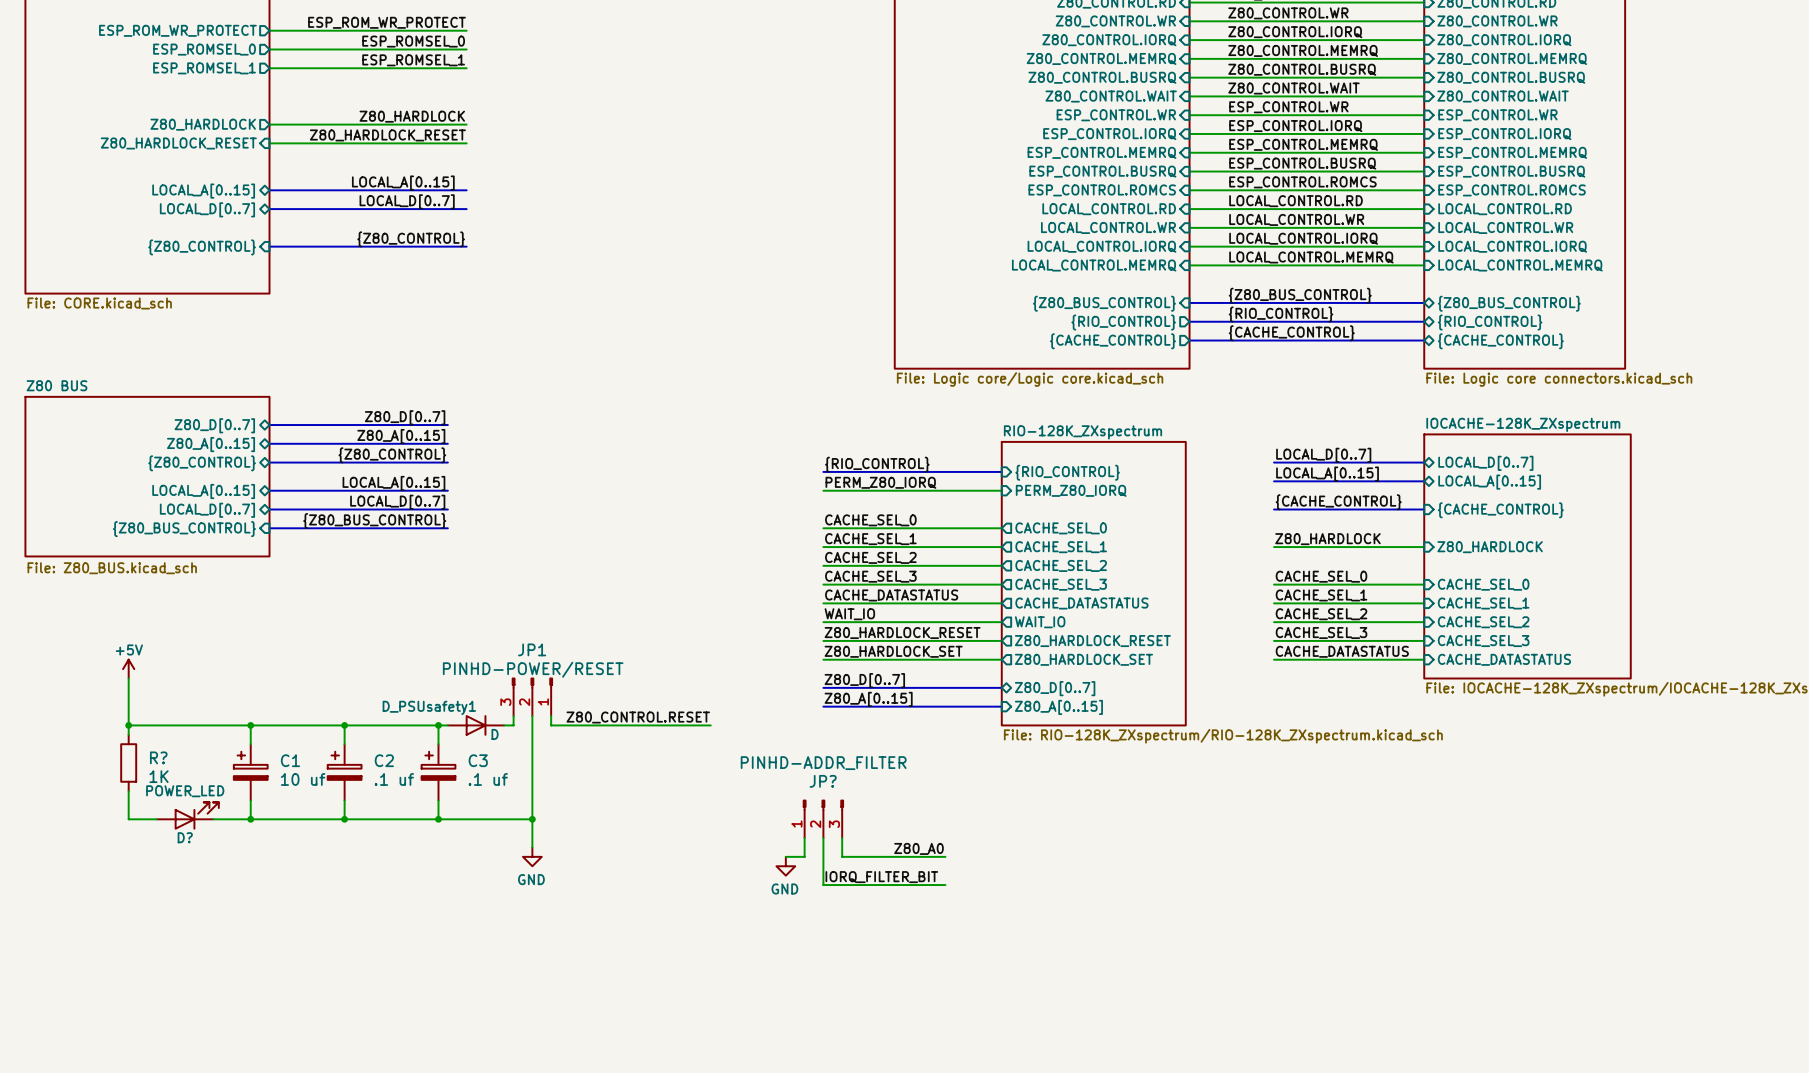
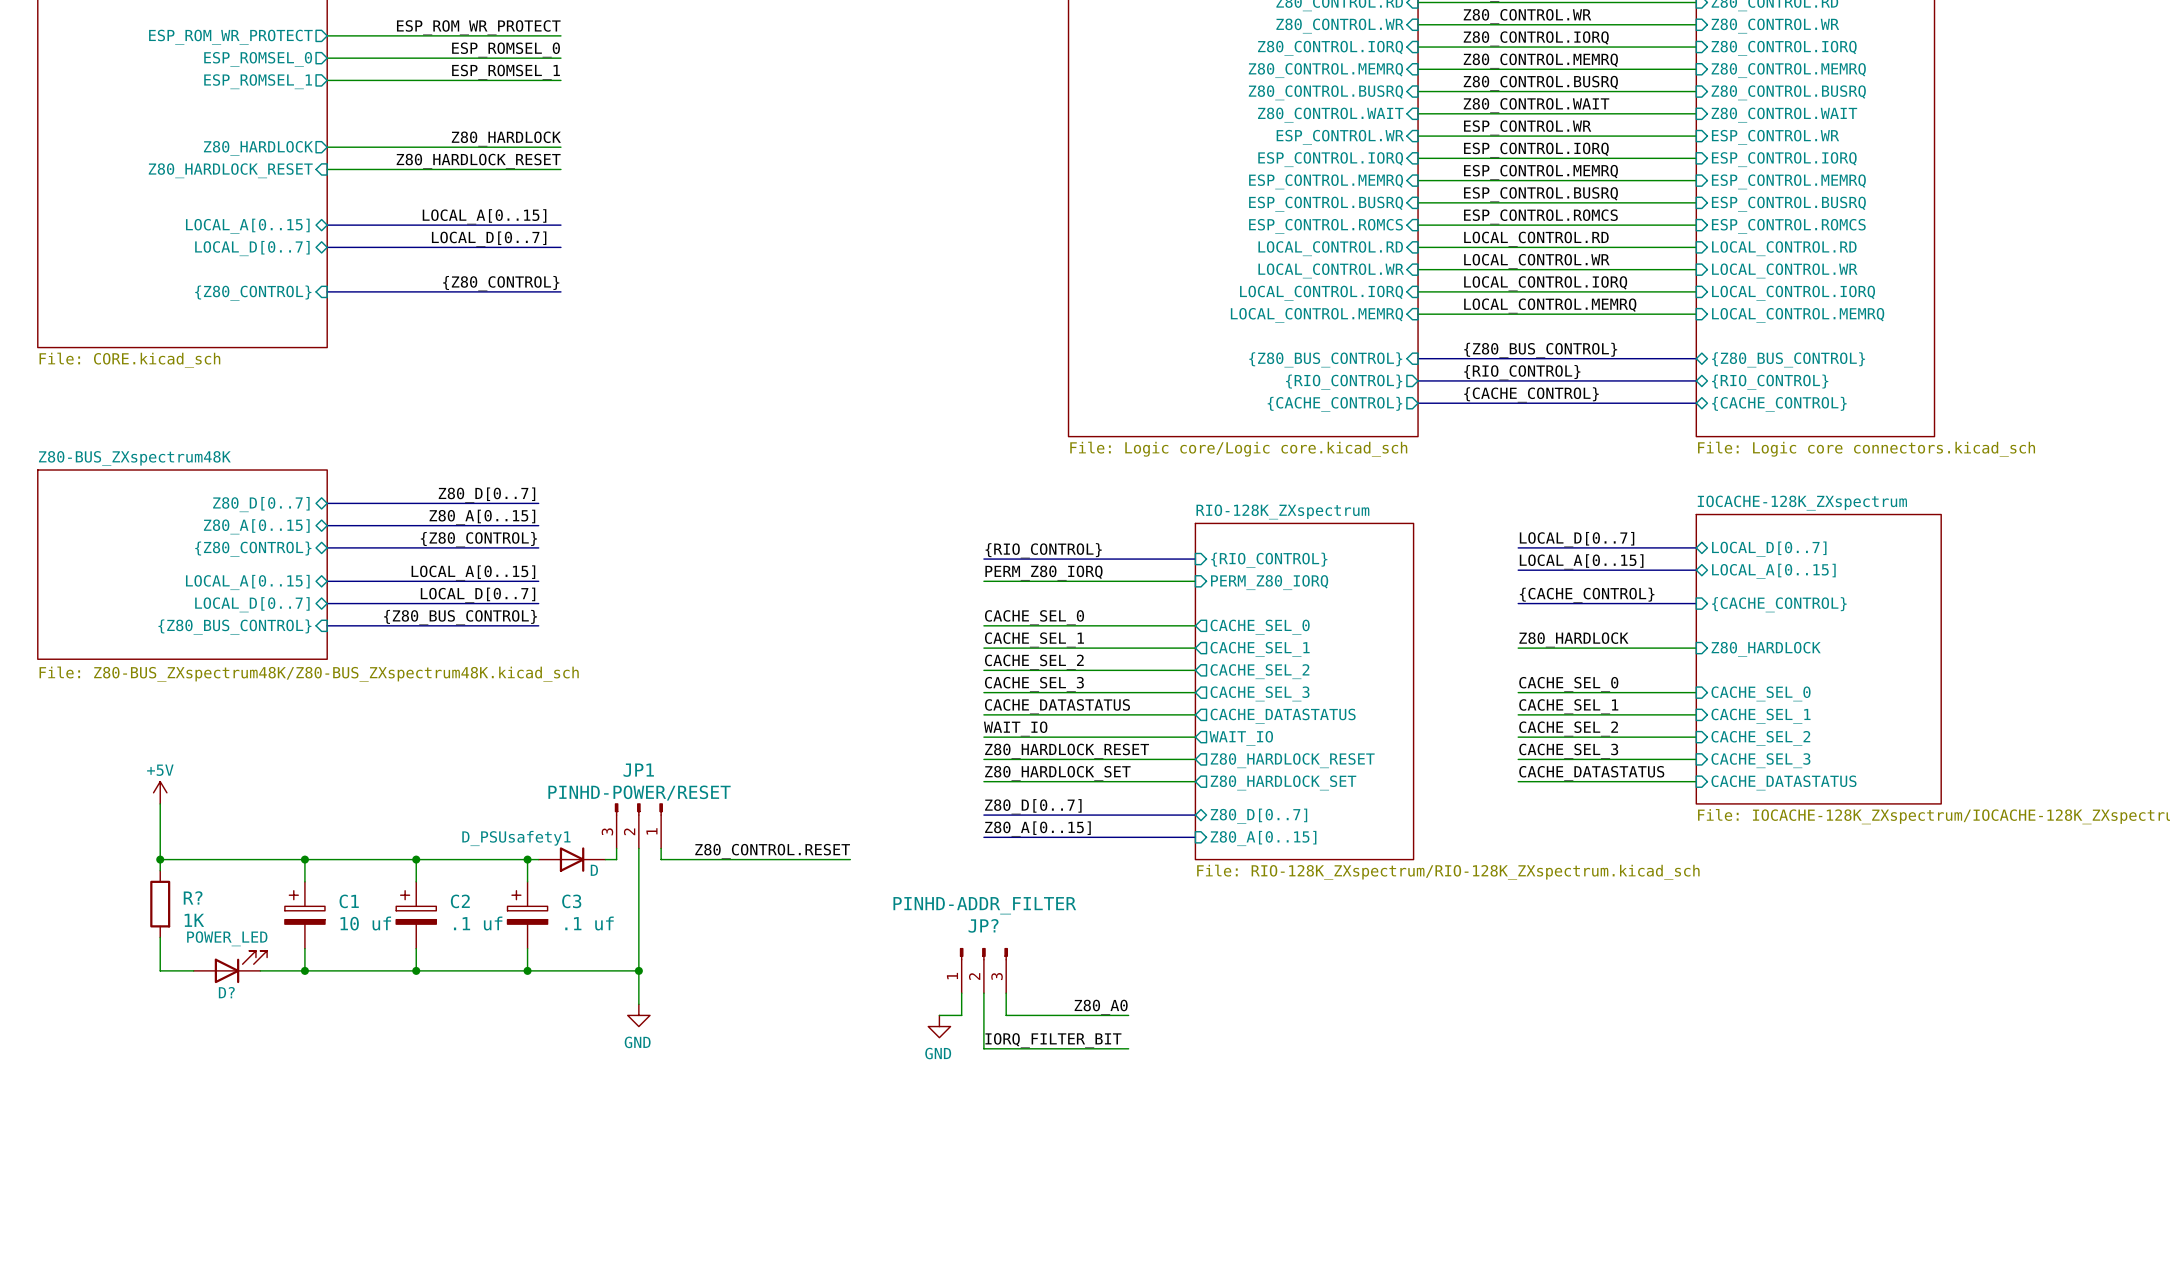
sheet Z80 BUS name: Z80 BUS (57, 385) -> Z80-BUS_ZXspectrum48K (134, 458)
sheet Z80 BUS value: File: Z80_BUS.kicad_sch (112, 568) -> File: Z80-BUS_ZXspectrum48K/Z80-BUS_ZXspectrum48K.kicad_sch (309, 674)

